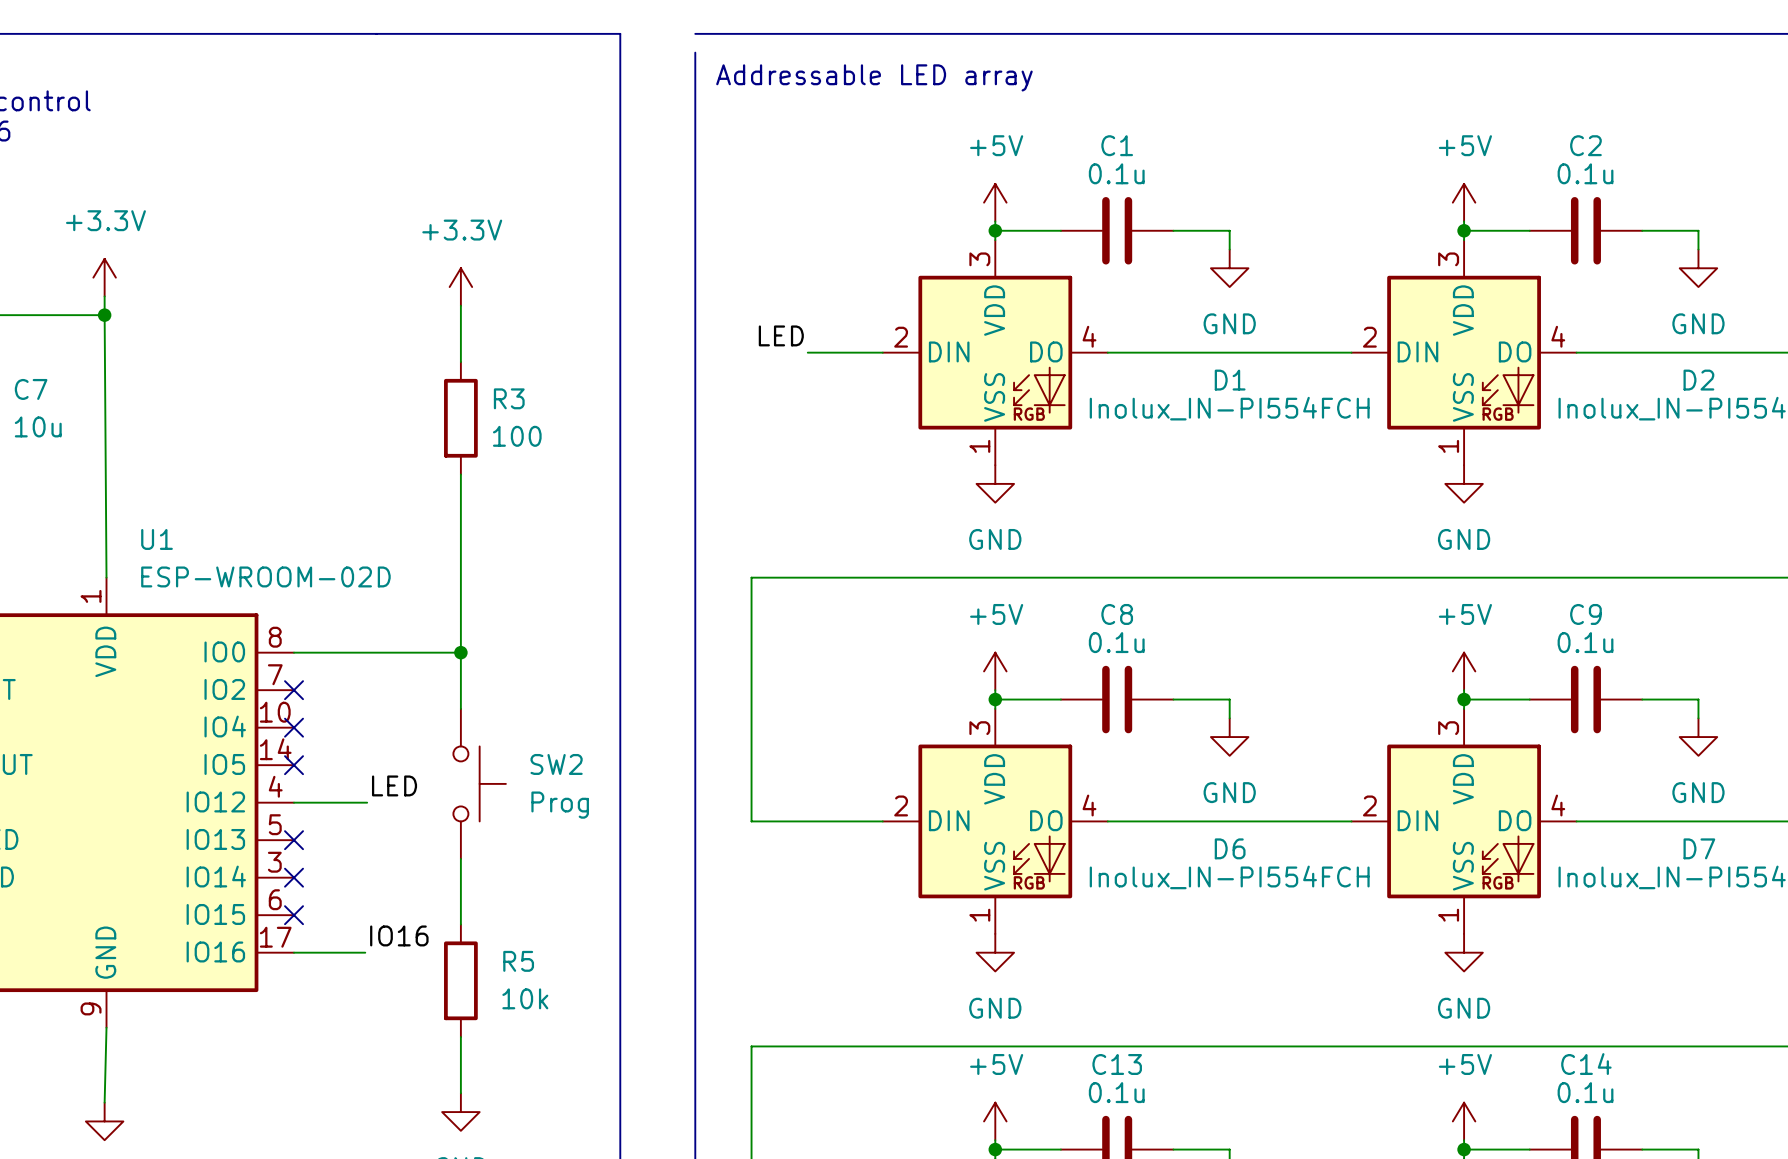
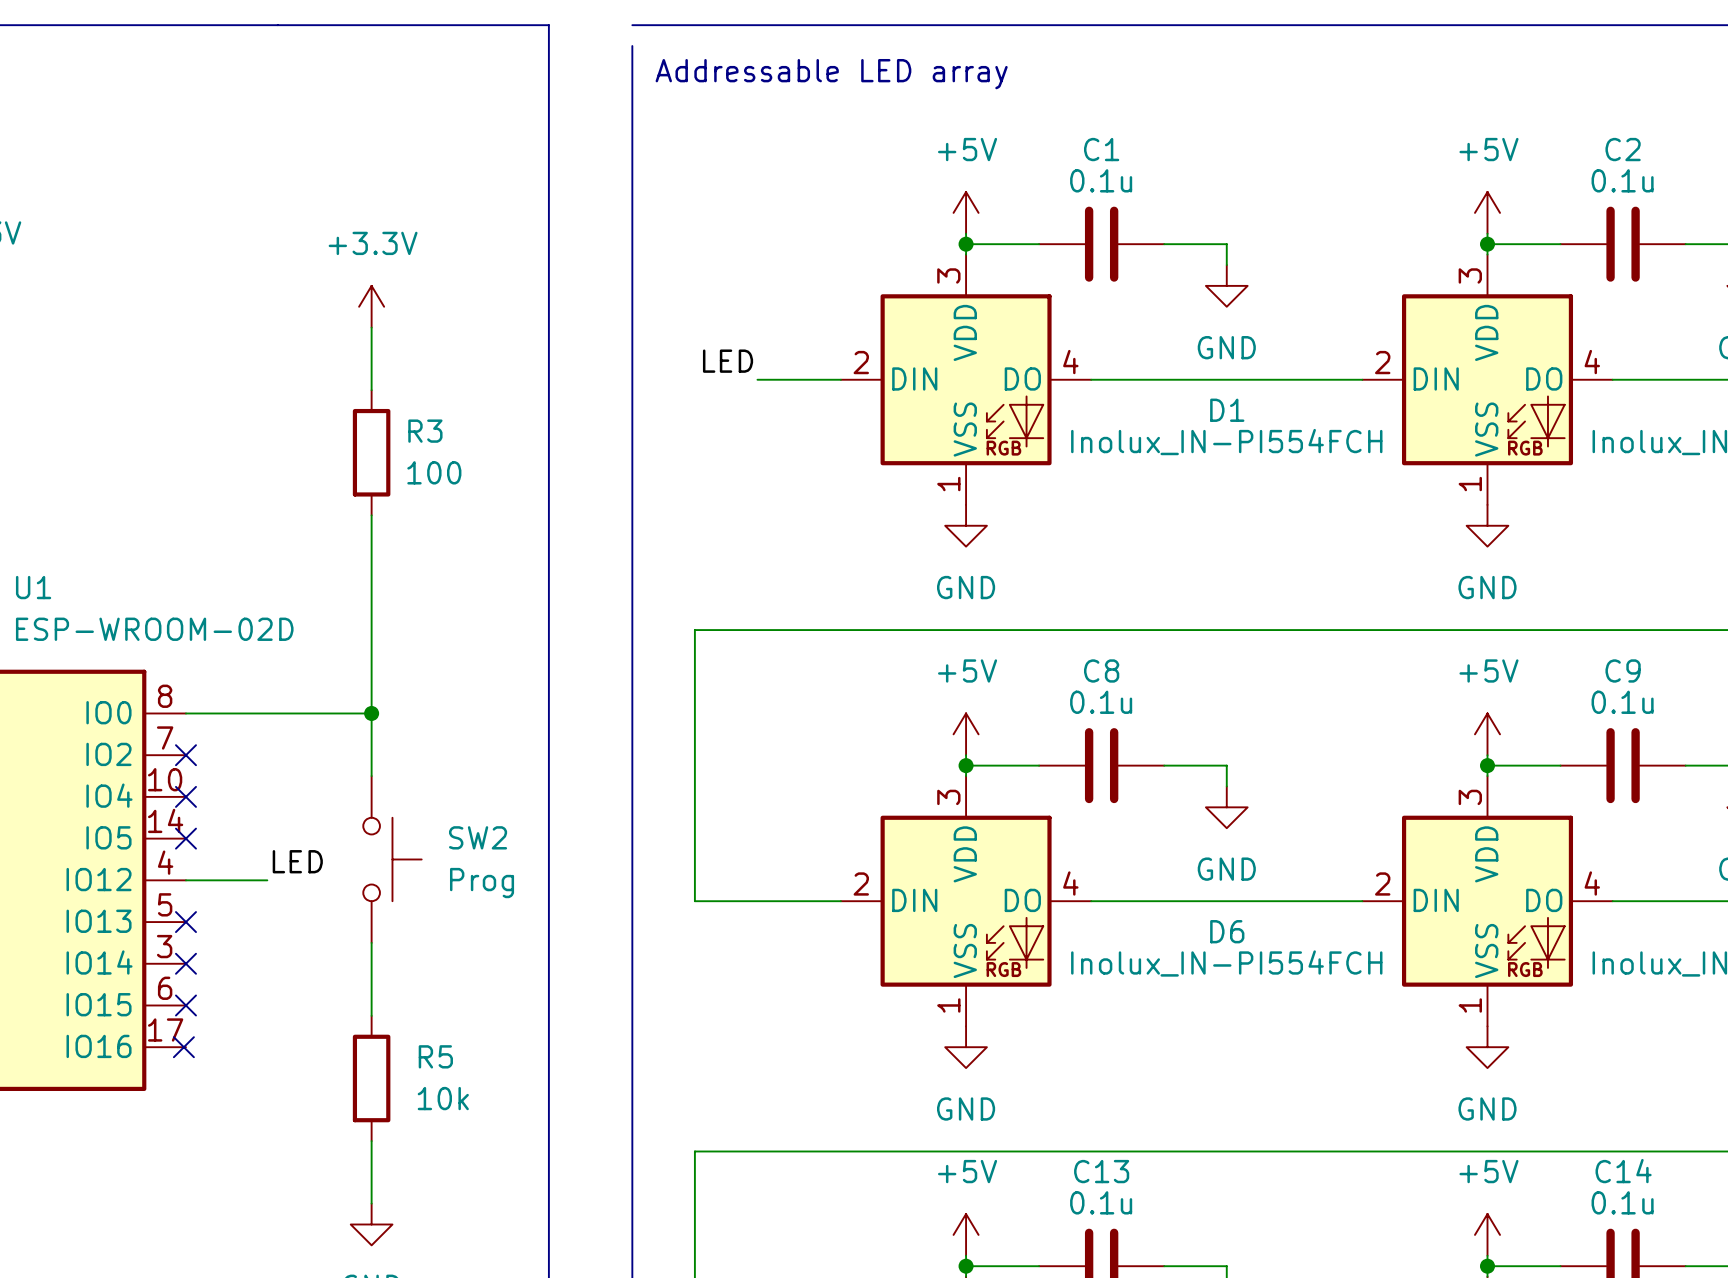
label: IO16 (399, 935) -> none
no-connect mark: none -> (183, 1047)
wire: (294, 952) (365, 952) -> none

